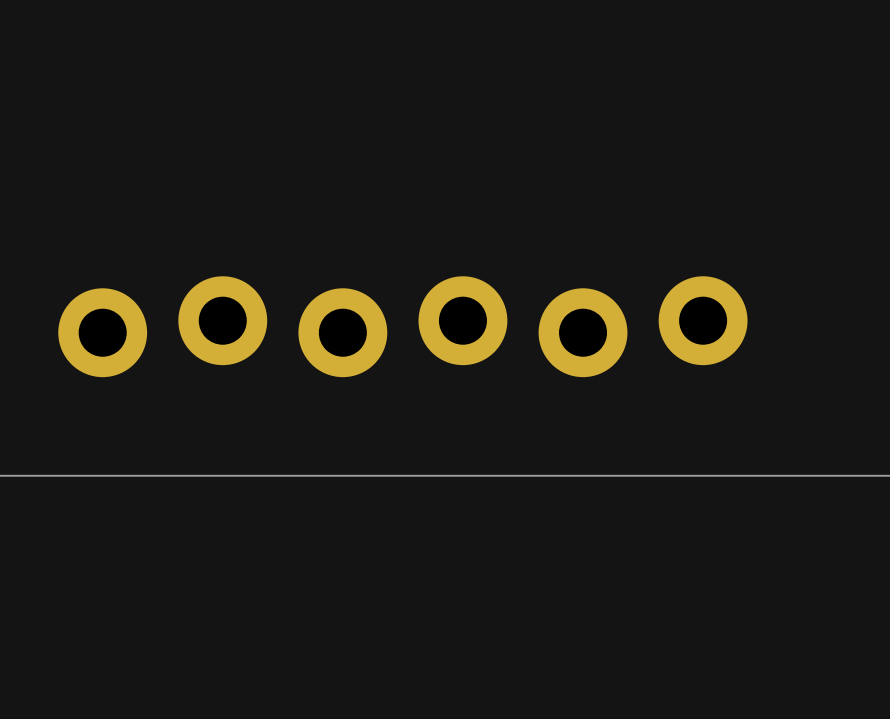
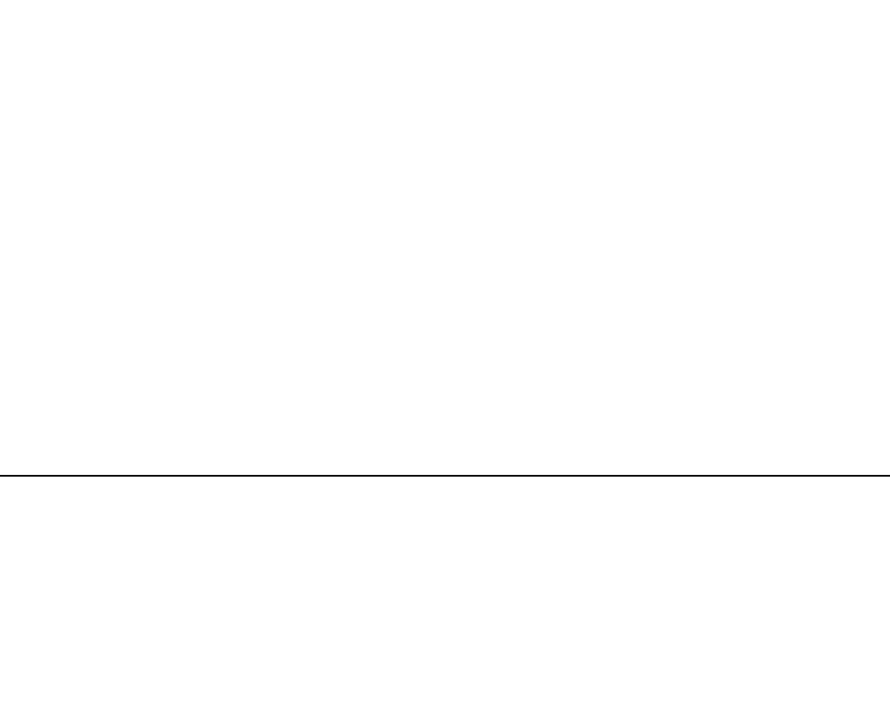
part: (402, 326) -> none

